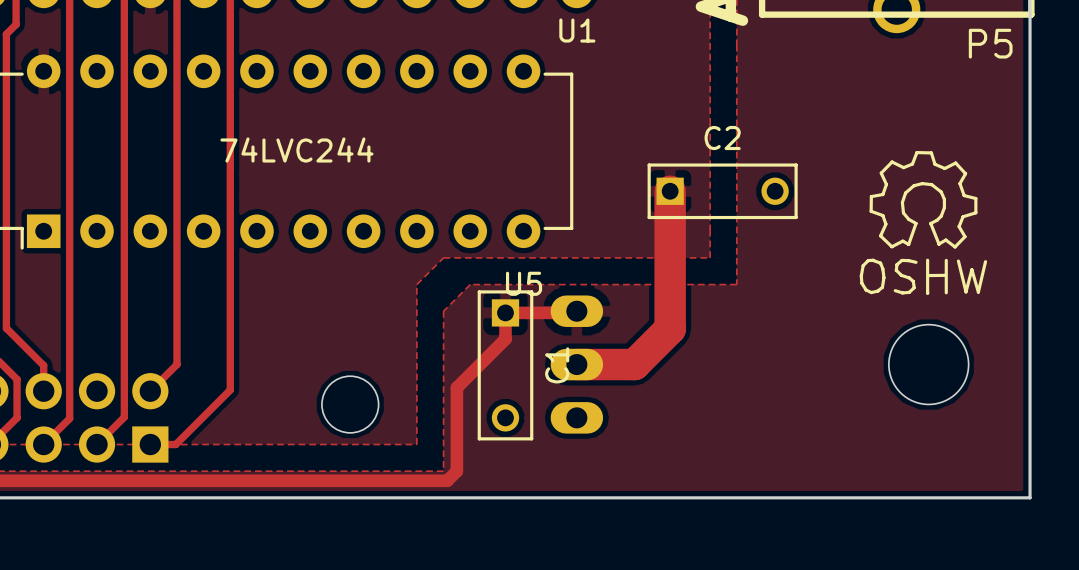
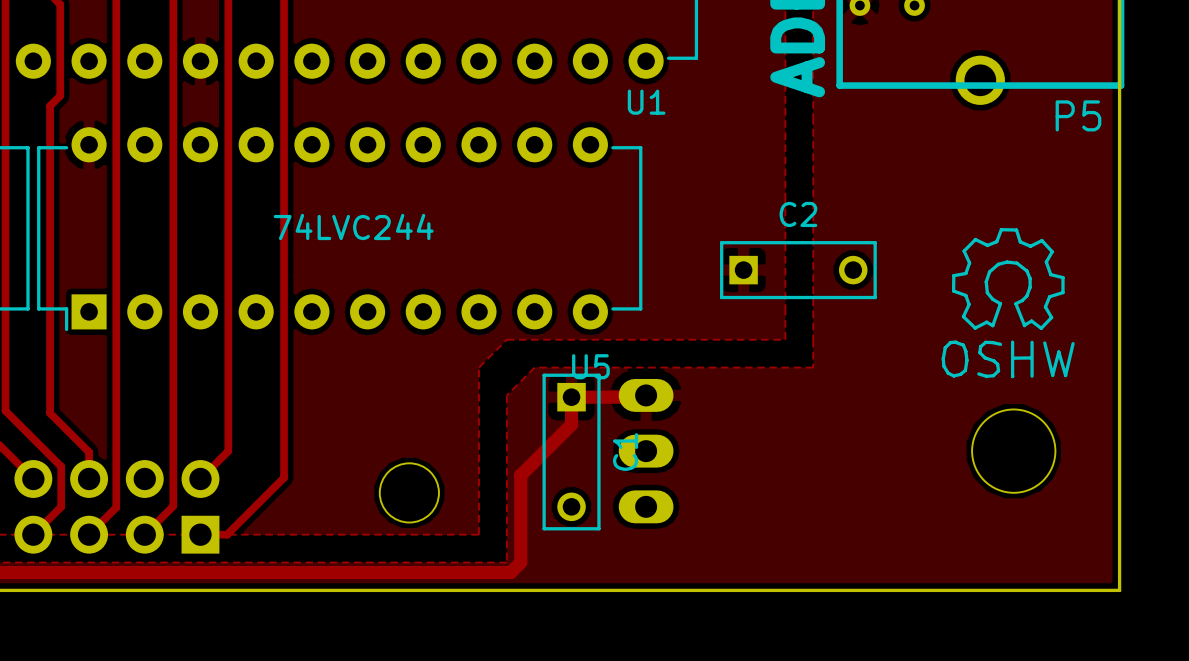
track: (670, 191) (670, 328) (634, 364) (576, 364) -> none

